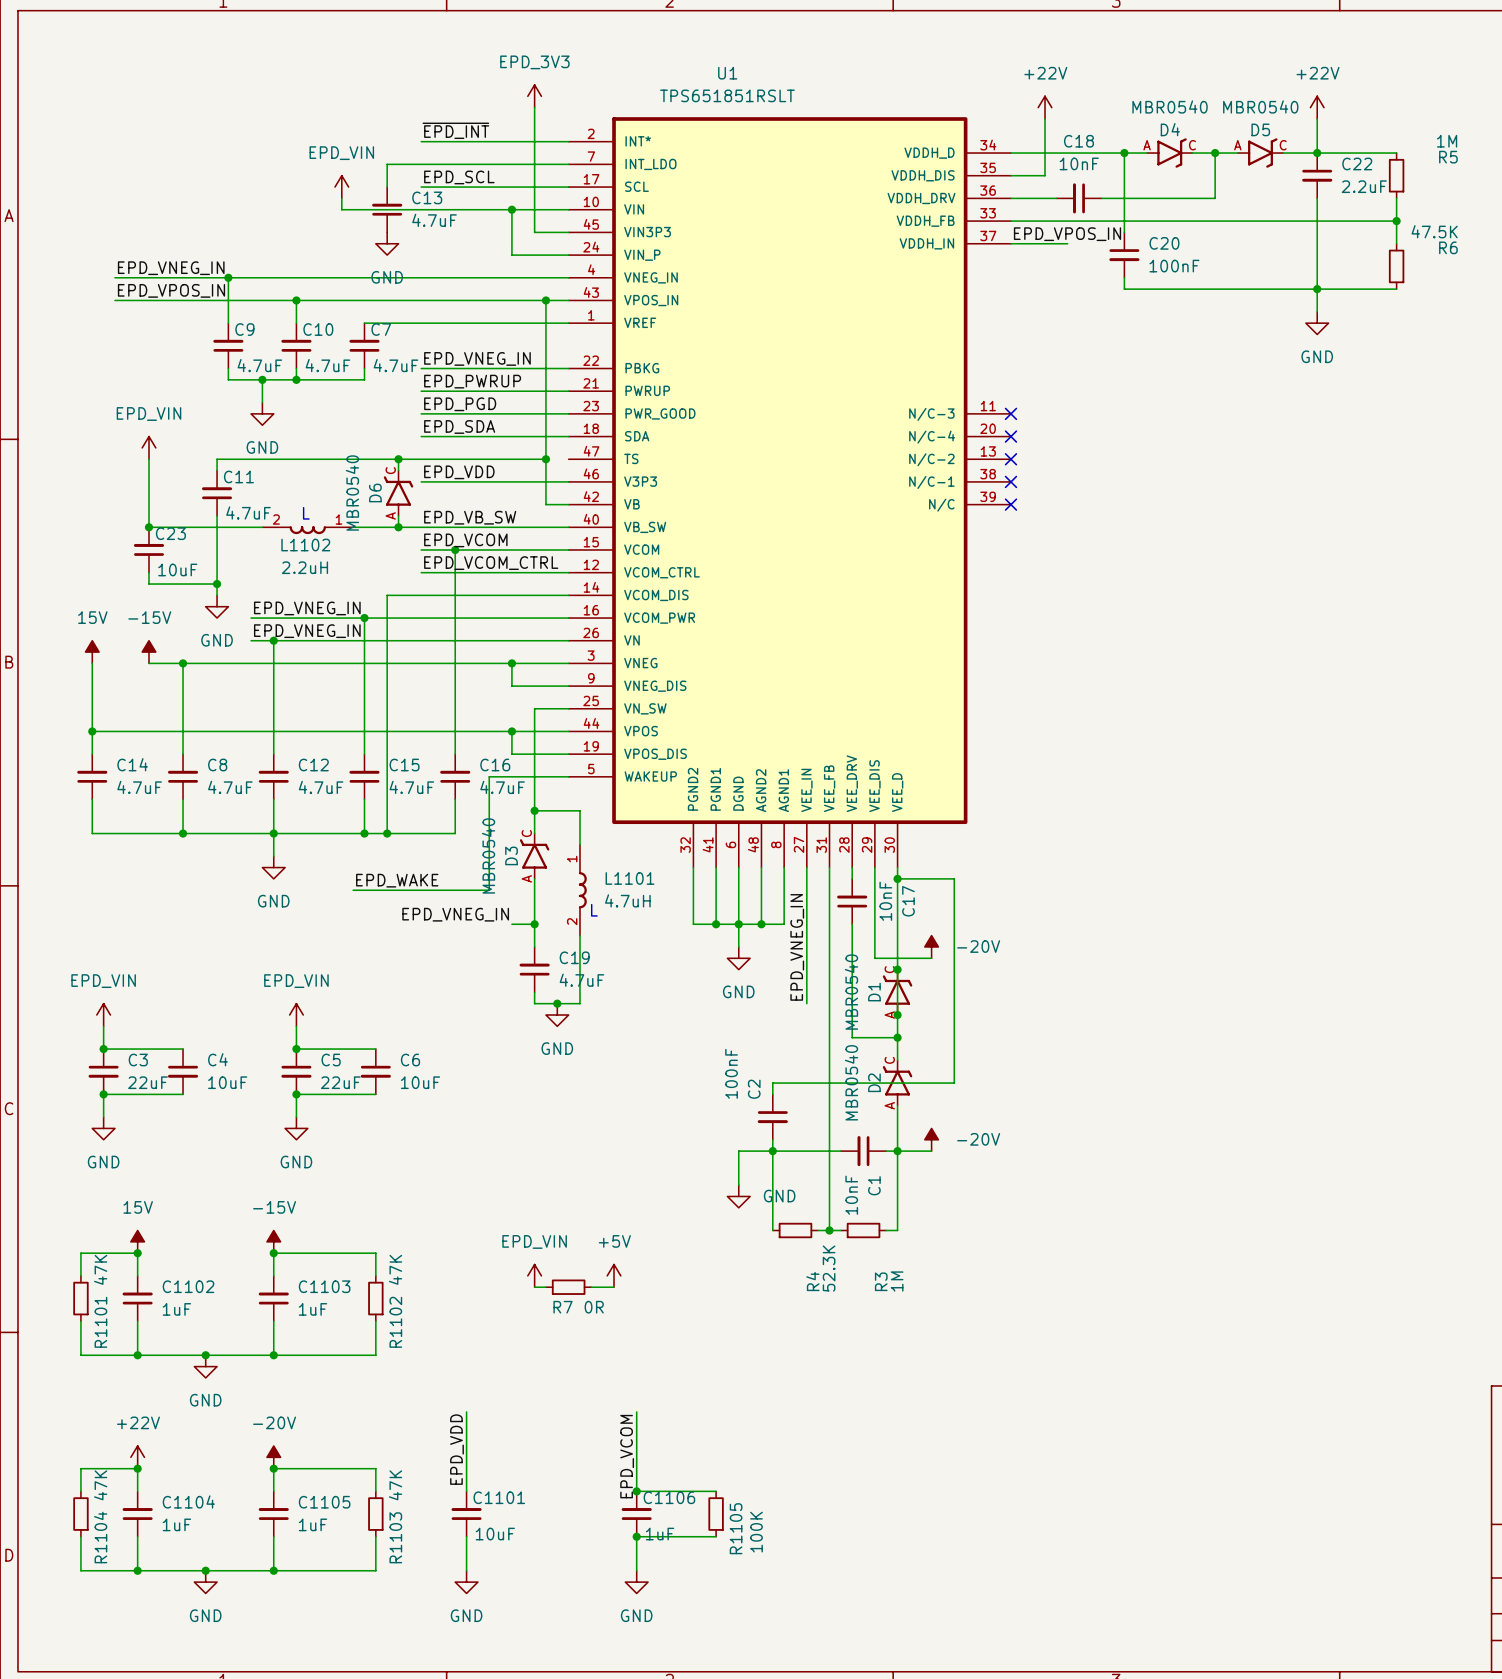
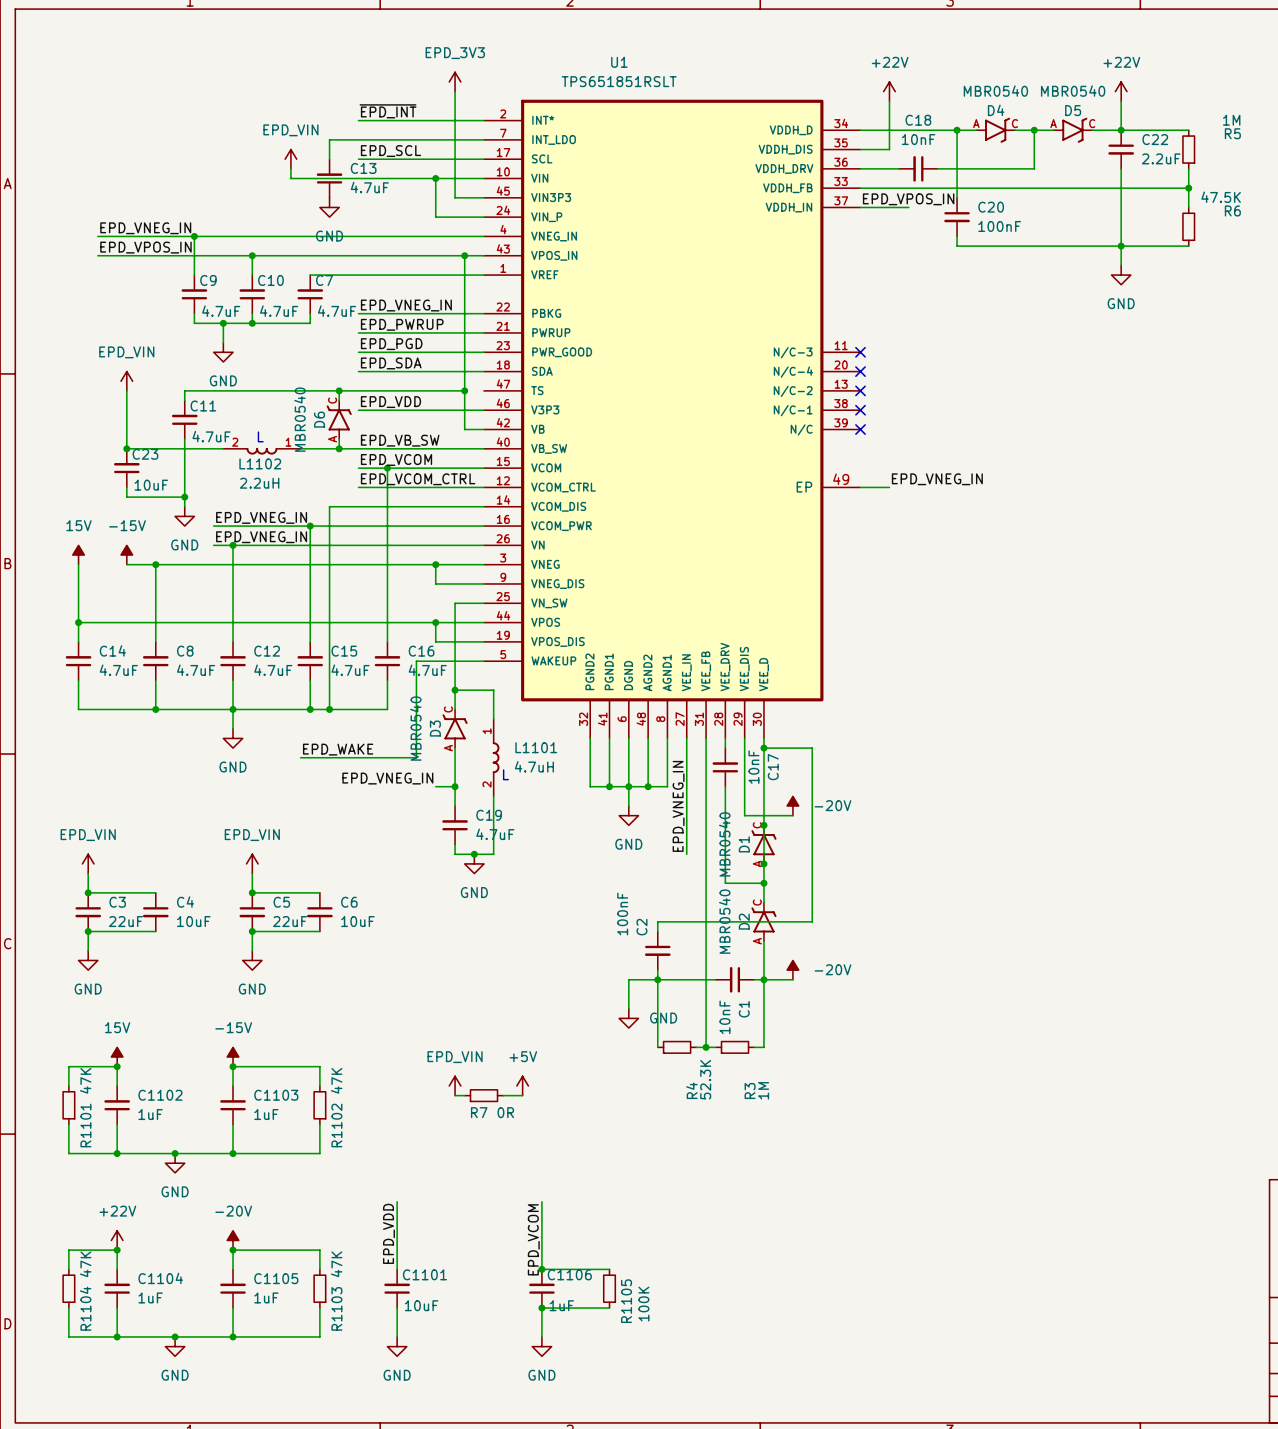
U1 symbol: [568, 117, 1011, 868] -> [484, 99, 861, 739]
label: none -> EPD_VNEG_IN (937, 479)
wire: none -> (860, 487) (889, 487)

